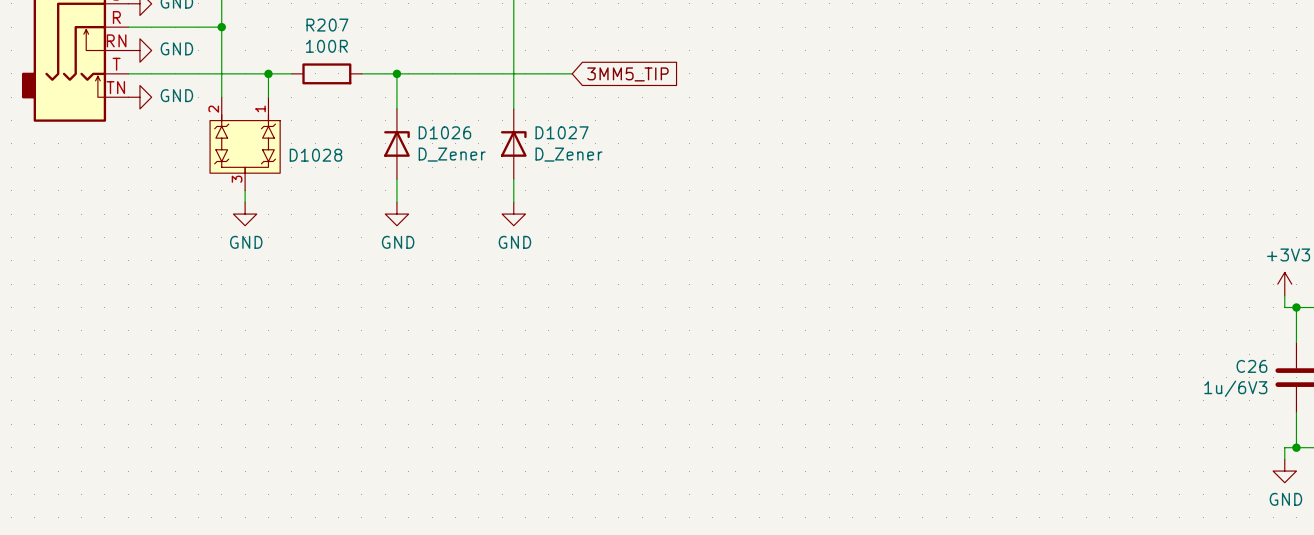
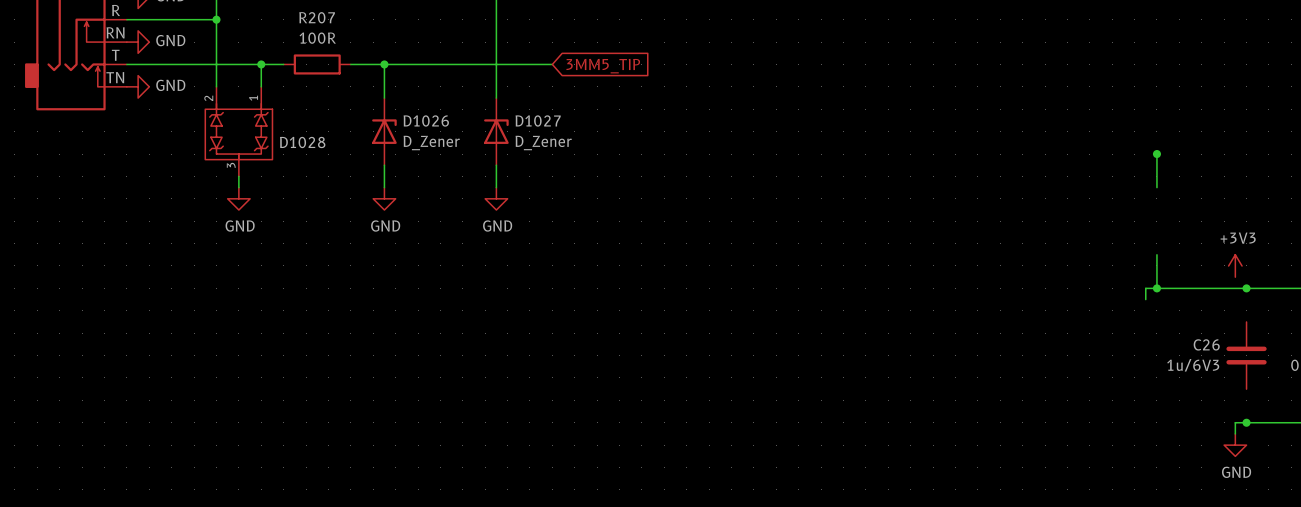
junction: none -> (1156, 154)
wire: (1284, 295) (1284, 307) -> (1145, 299) (1145, 288) (1235, 288)
junction: none -> (1156, 288)
wire: (1296, 307) (1296, 342) -> (1156, 154) (1156, 187)
wire: (1296, 412) (1296, 447) -> (1156, 254) (1156, 288)

